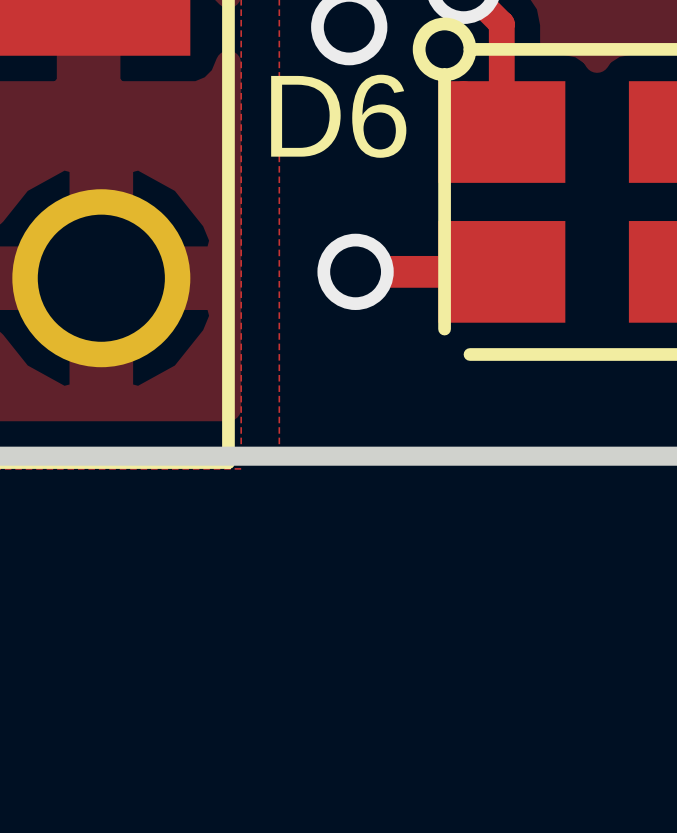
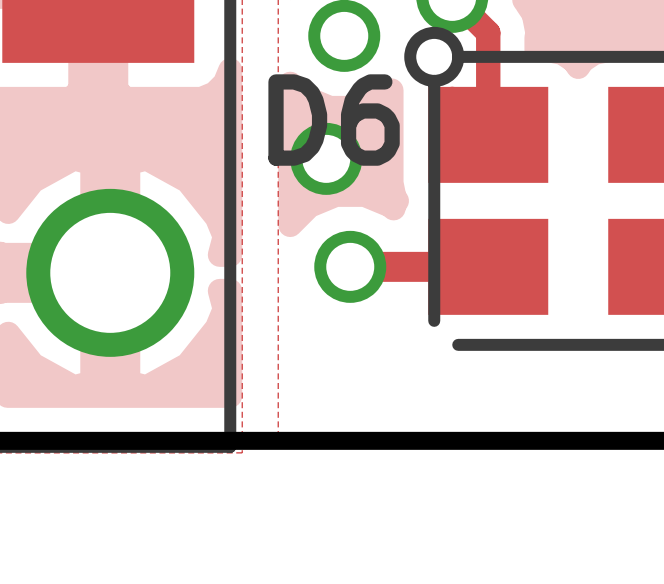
via: none -> (326, 158)

